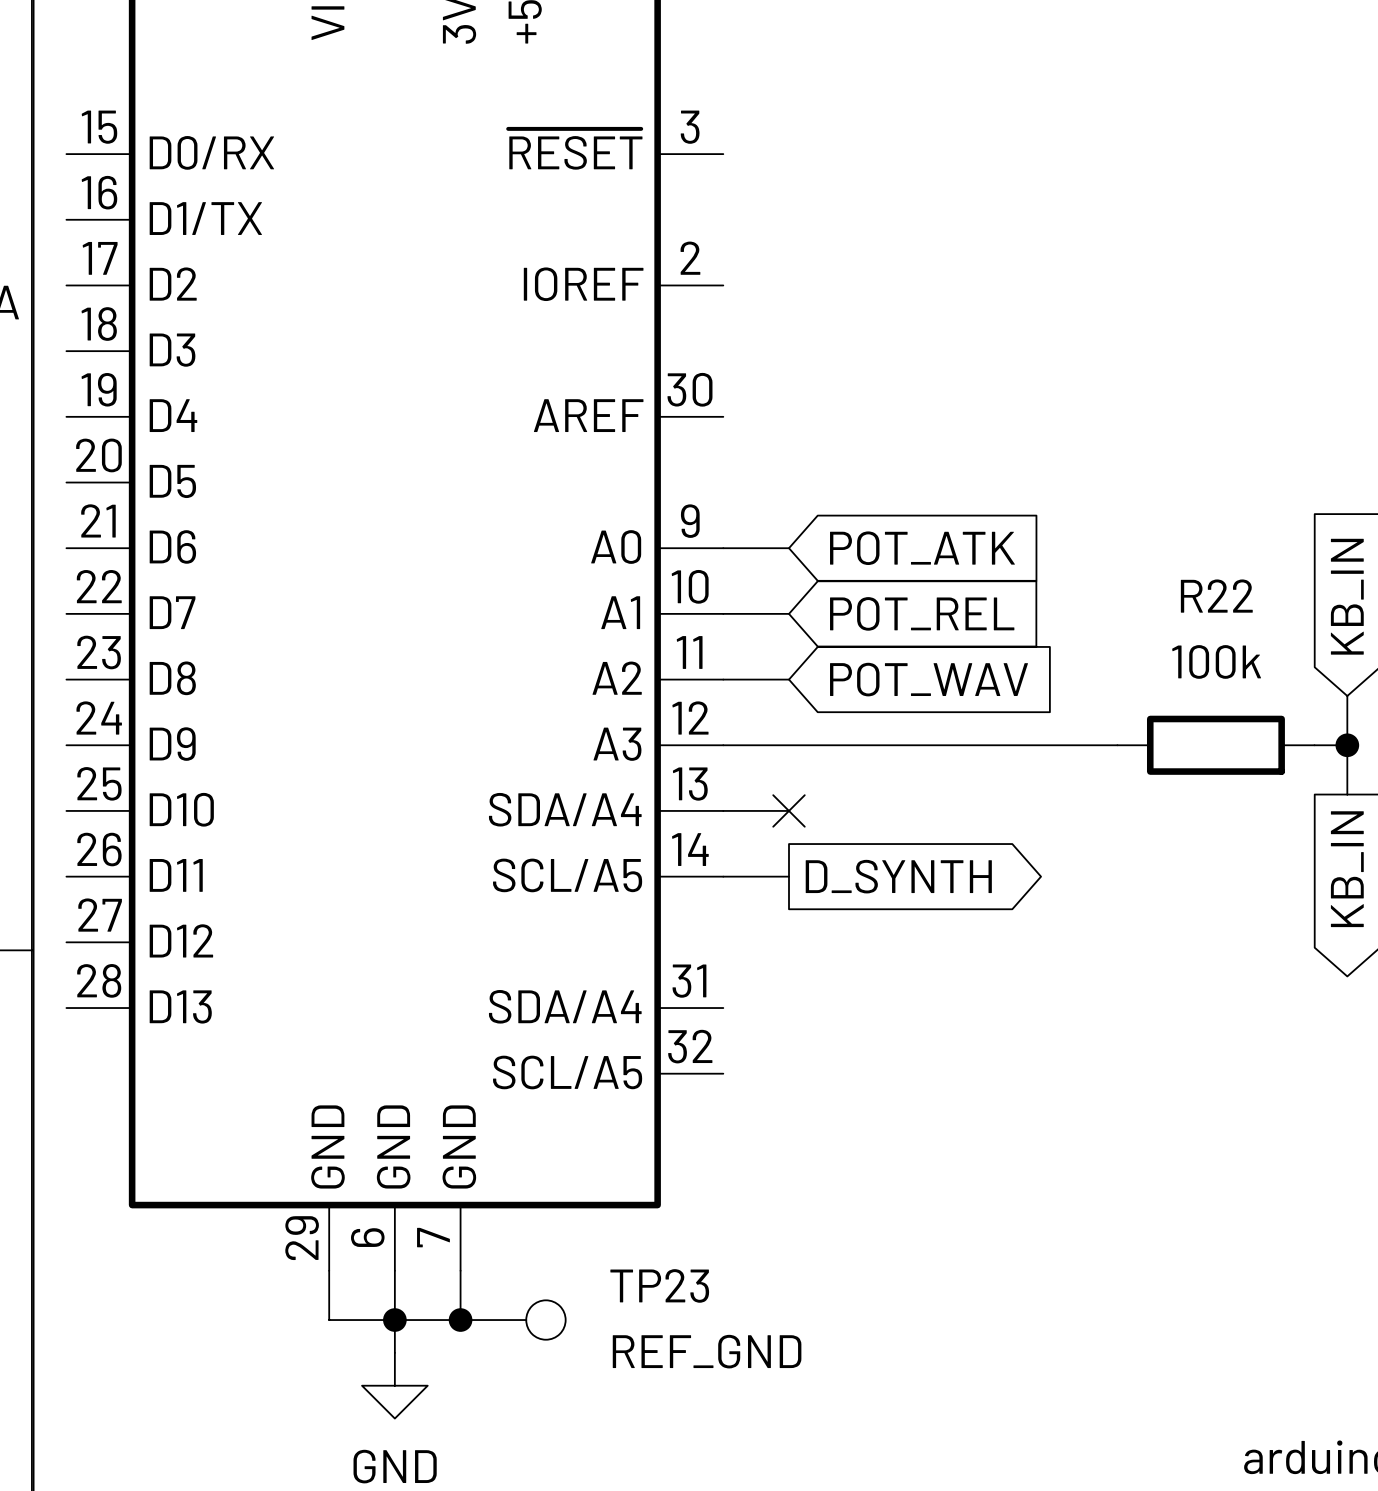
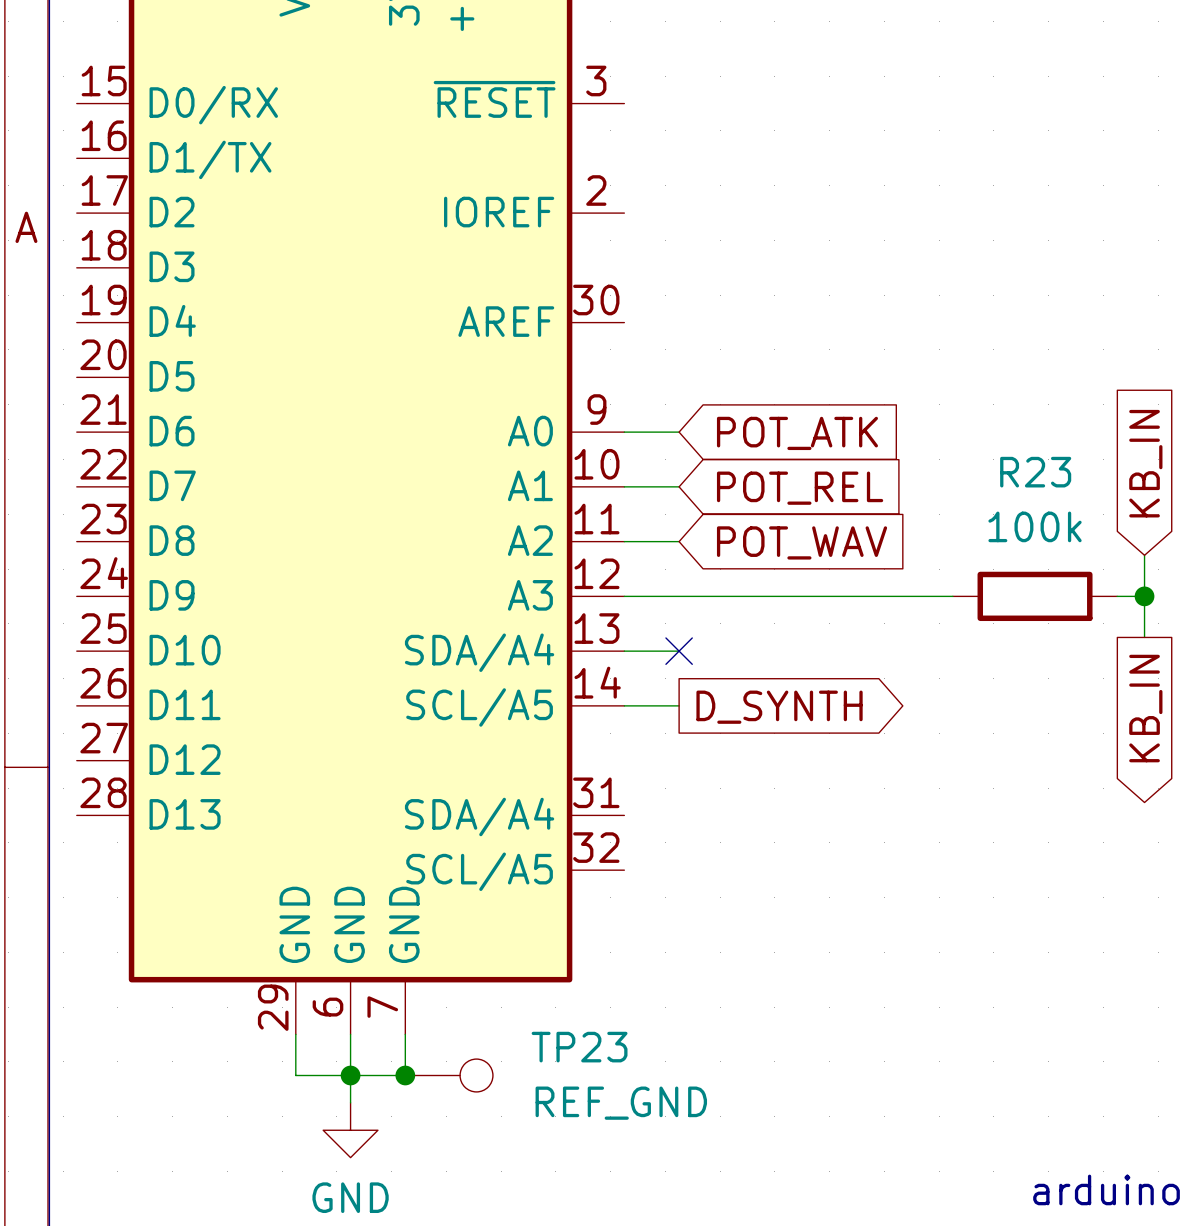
R22 name: R22 (1216, 596) -> R23 (1035, 472)

